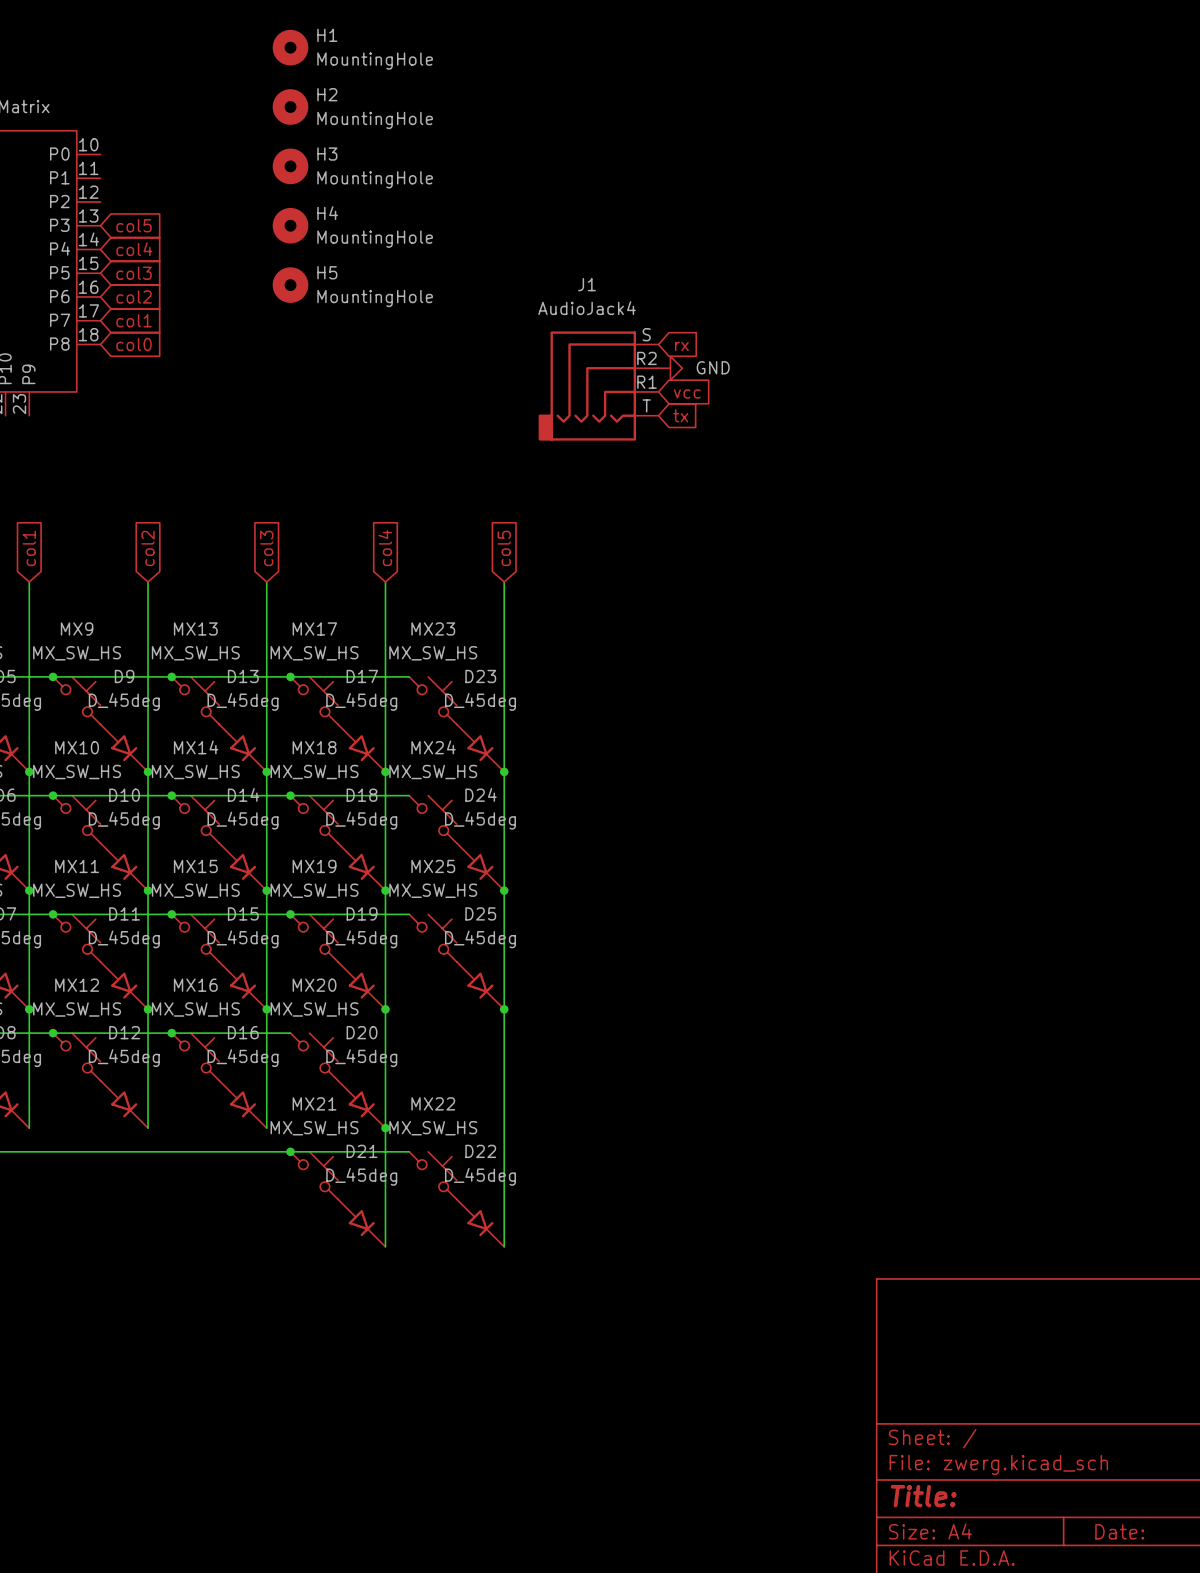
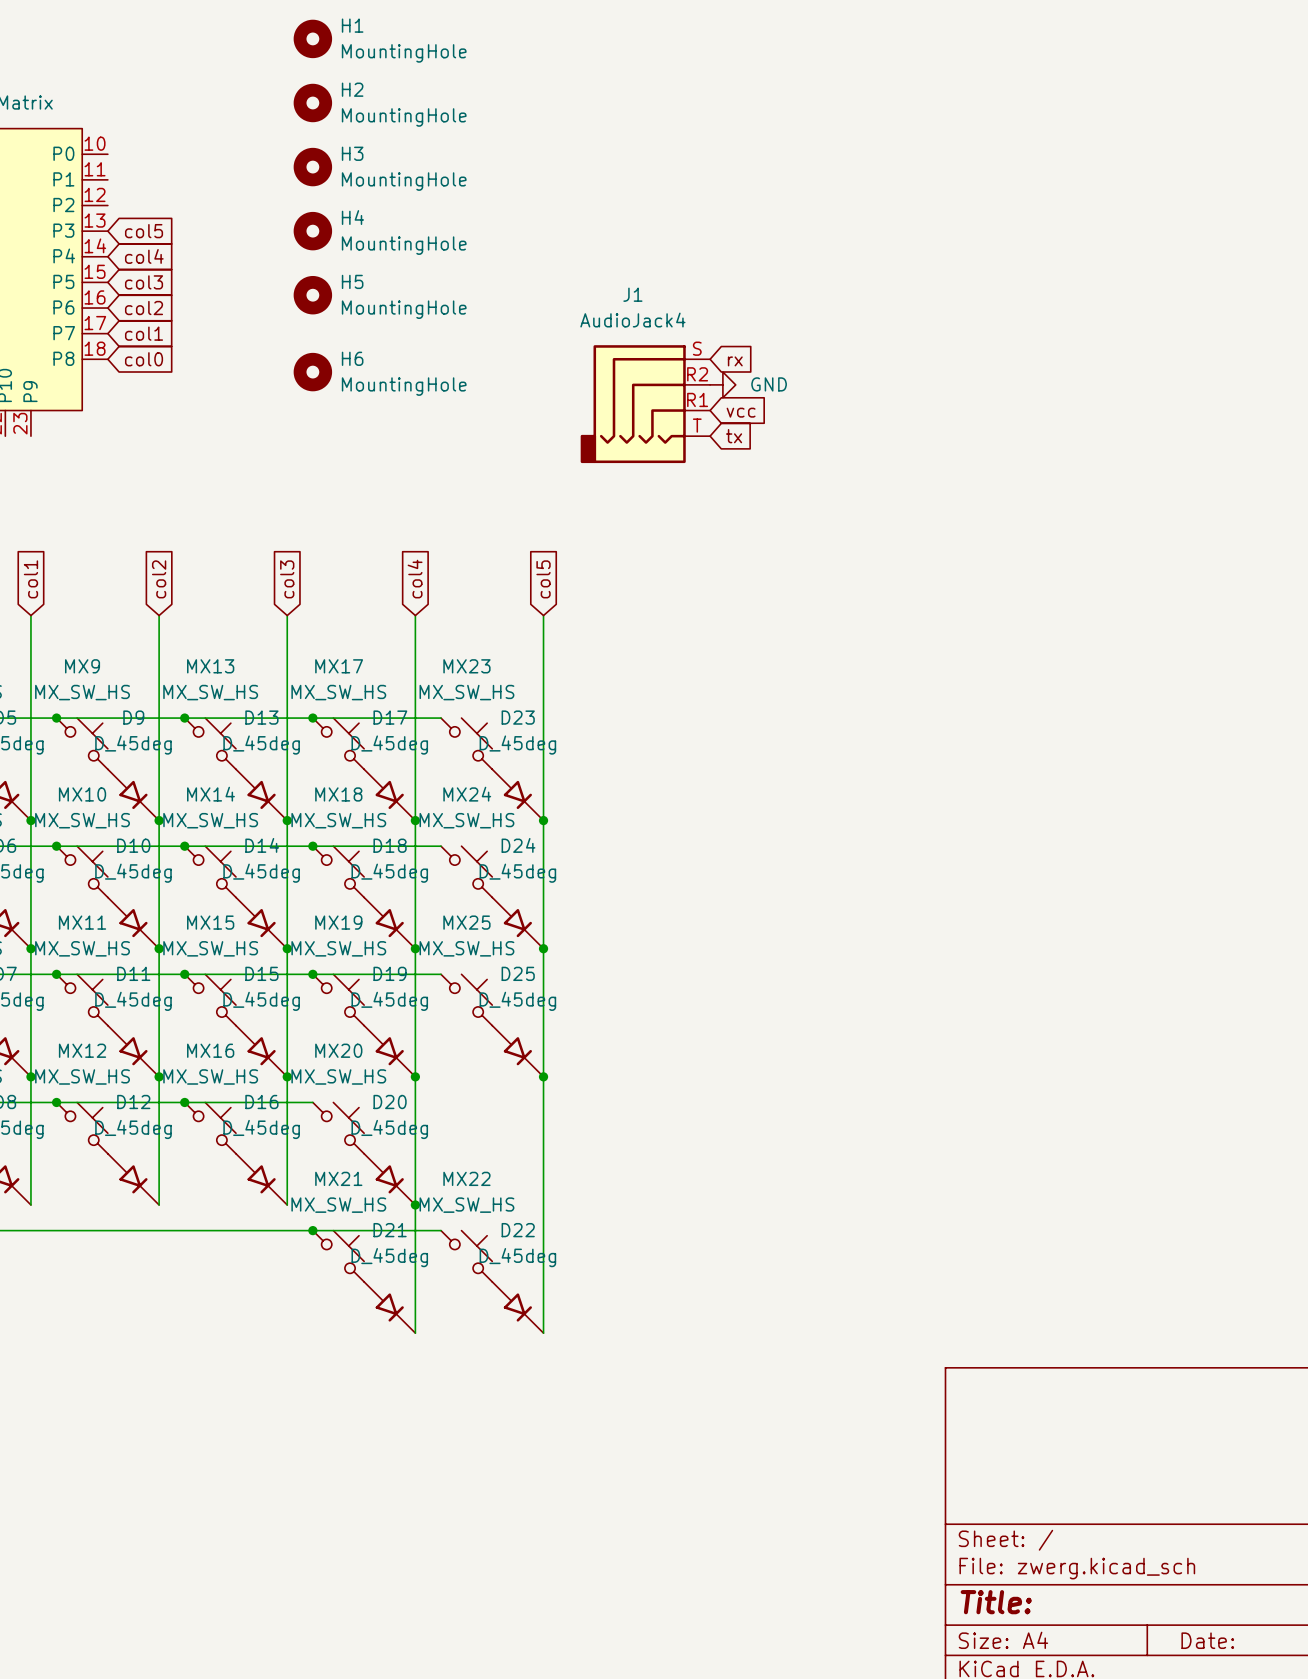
H6: none -> MountingHole (312, 372)

